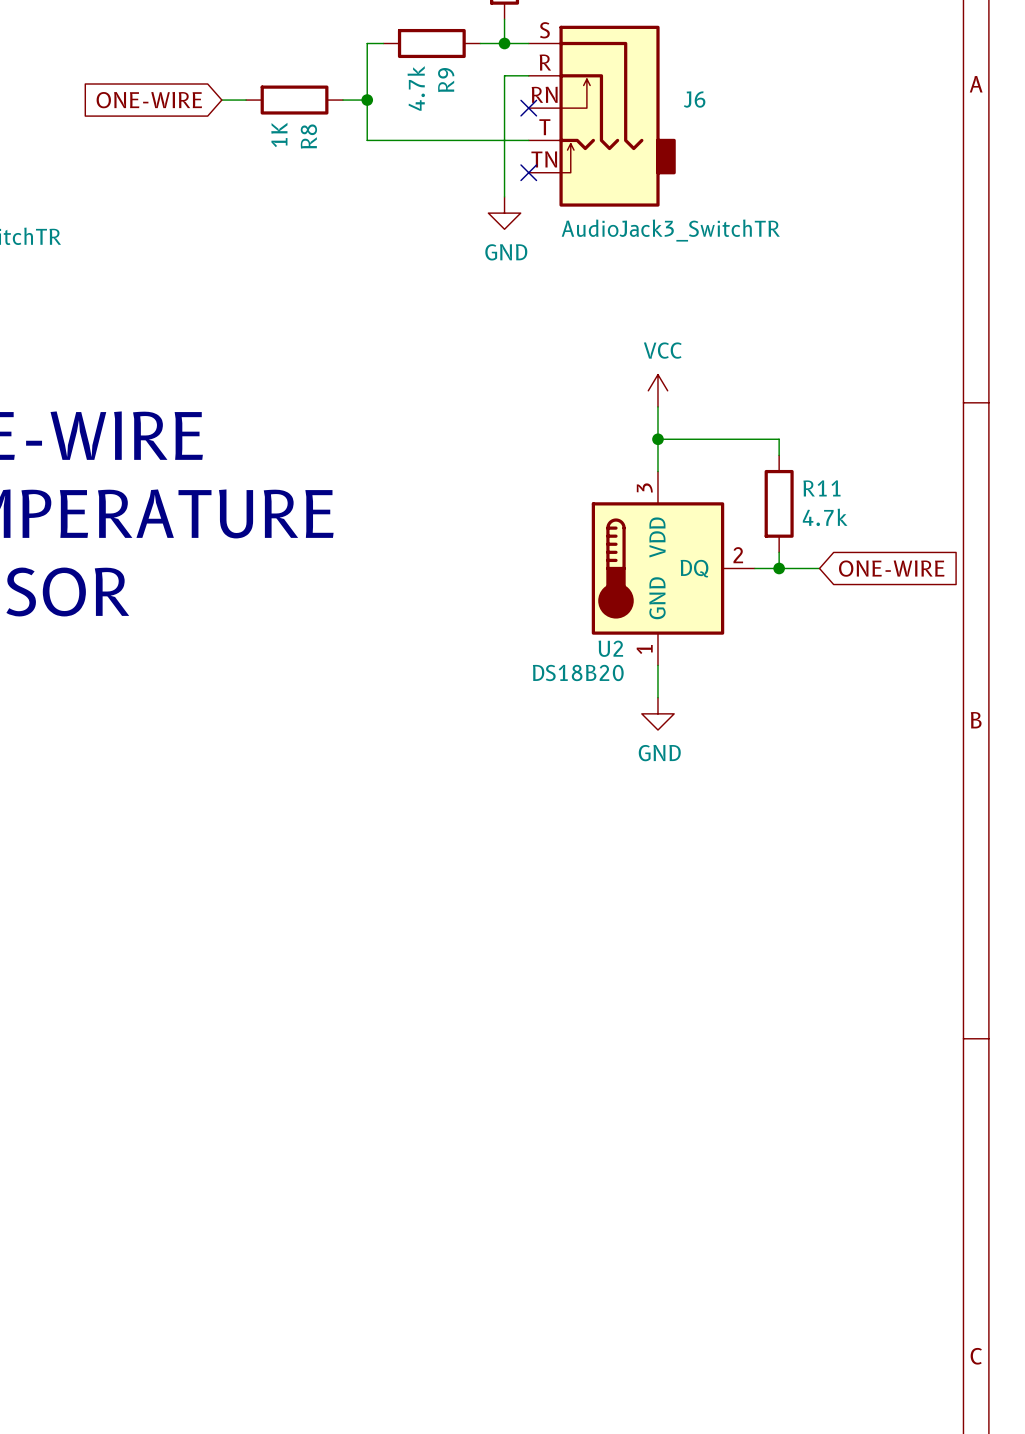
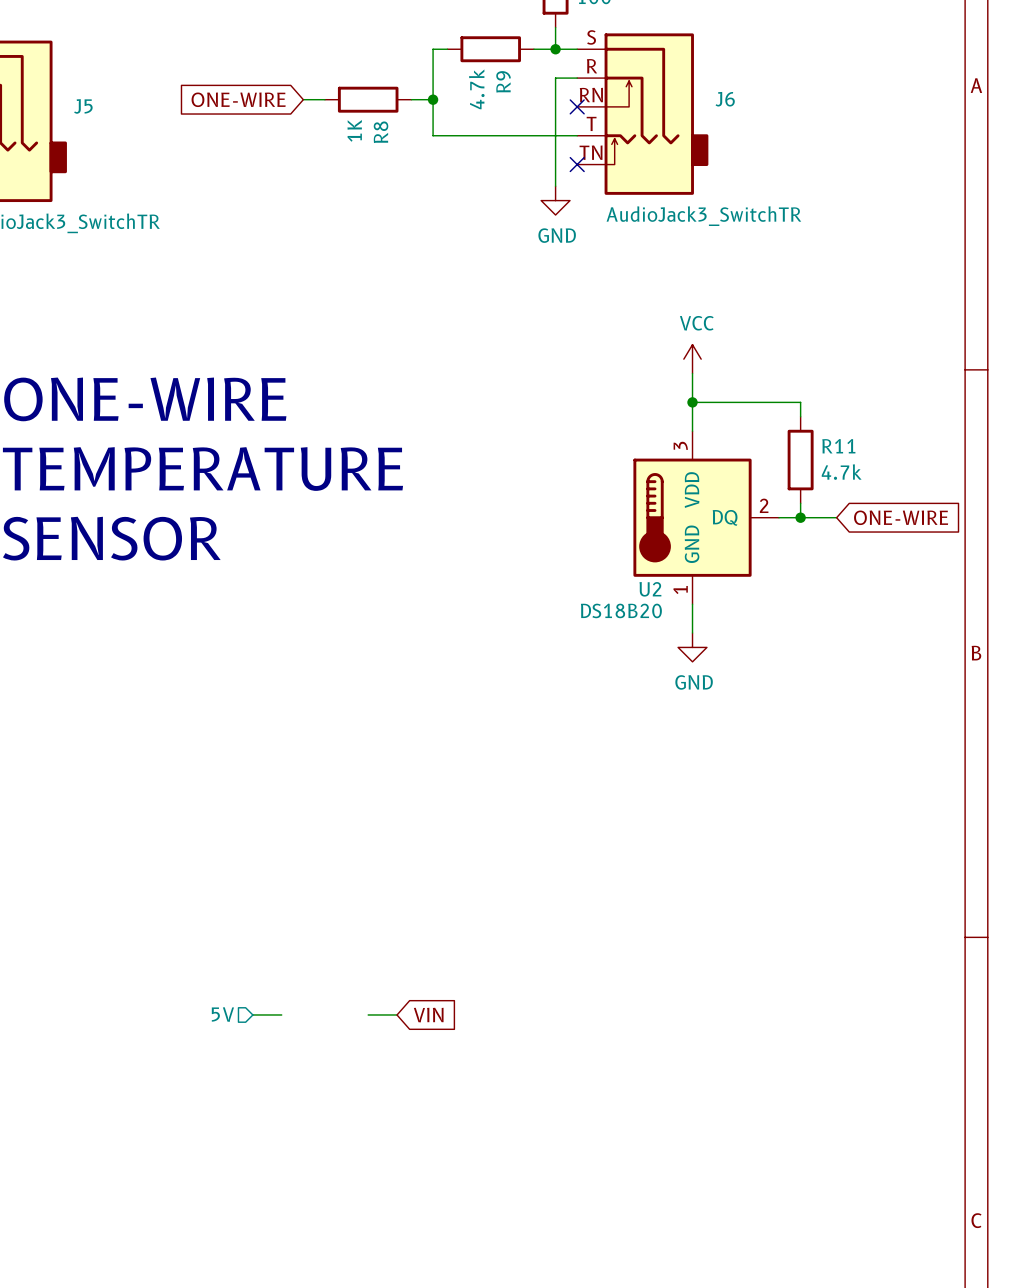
sheet pin: none -> 5V (222, 1014)
wire: none -> (252, 1014) (281, 1014)
wire: none -> (368, 1014) (397, 1014)
global label: none -> VIN (428, 1015)

